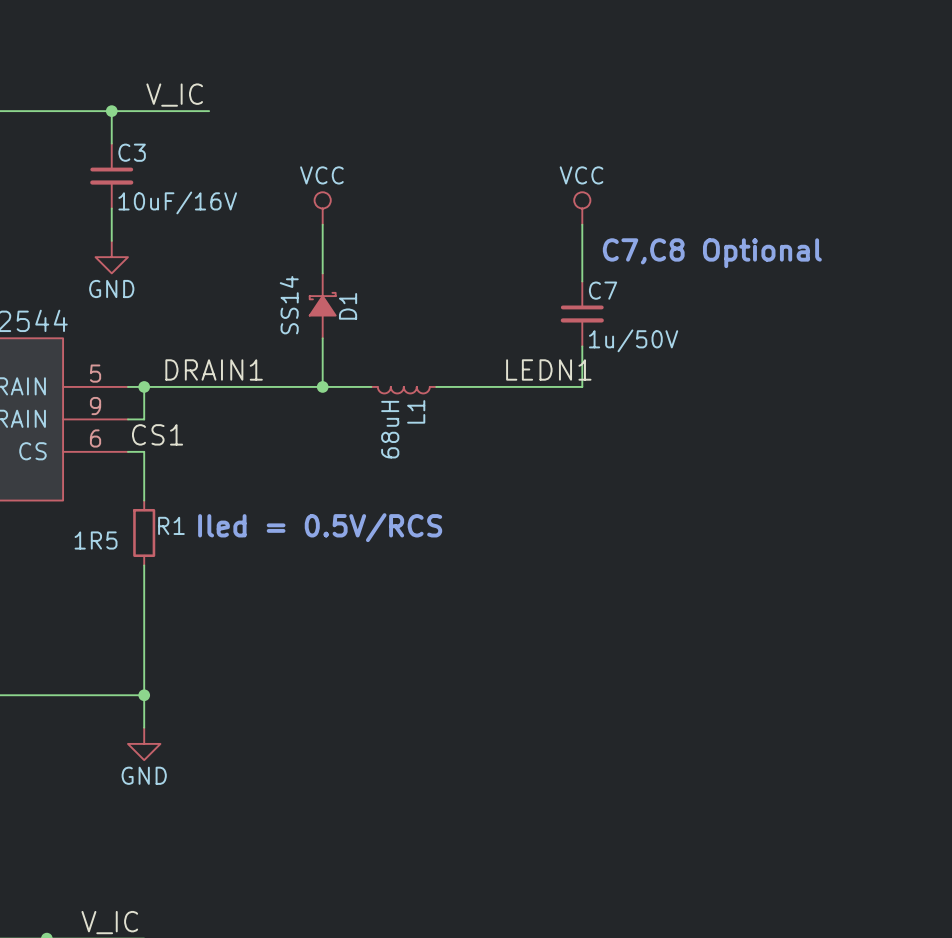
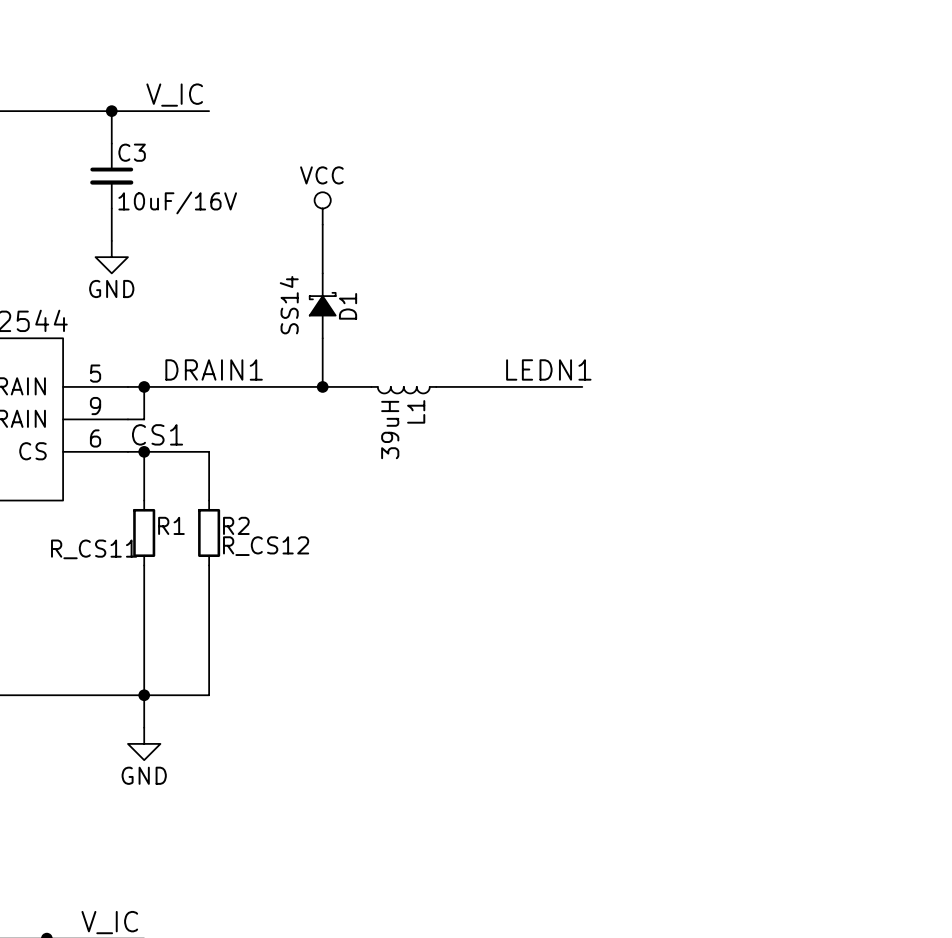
power symbol: VCC (582, 208) -> none
wire: (582, 224) (582, 281) -> none
text: C7,C8 Optional (712, 253) -> none
C7: 1u/50V (582, 313) -> none
wire: (582, 346) (582, 386) -> none
L1 value: 68uH (390, 429) -> 39uH (390, 430)
wire: none -> (144, 451) (209, 451) (209, 500)
junction: none -> (144, 451)
text: Iled = 0.5V/RCS (320, 527) -> none
R2: none -> R_CS12 (209, 532)
R1 value: 1R5 (96, 540) -> R_CS11 (94, 549)
wire: none -> (209, 565) (209, 695) (144, 695)

